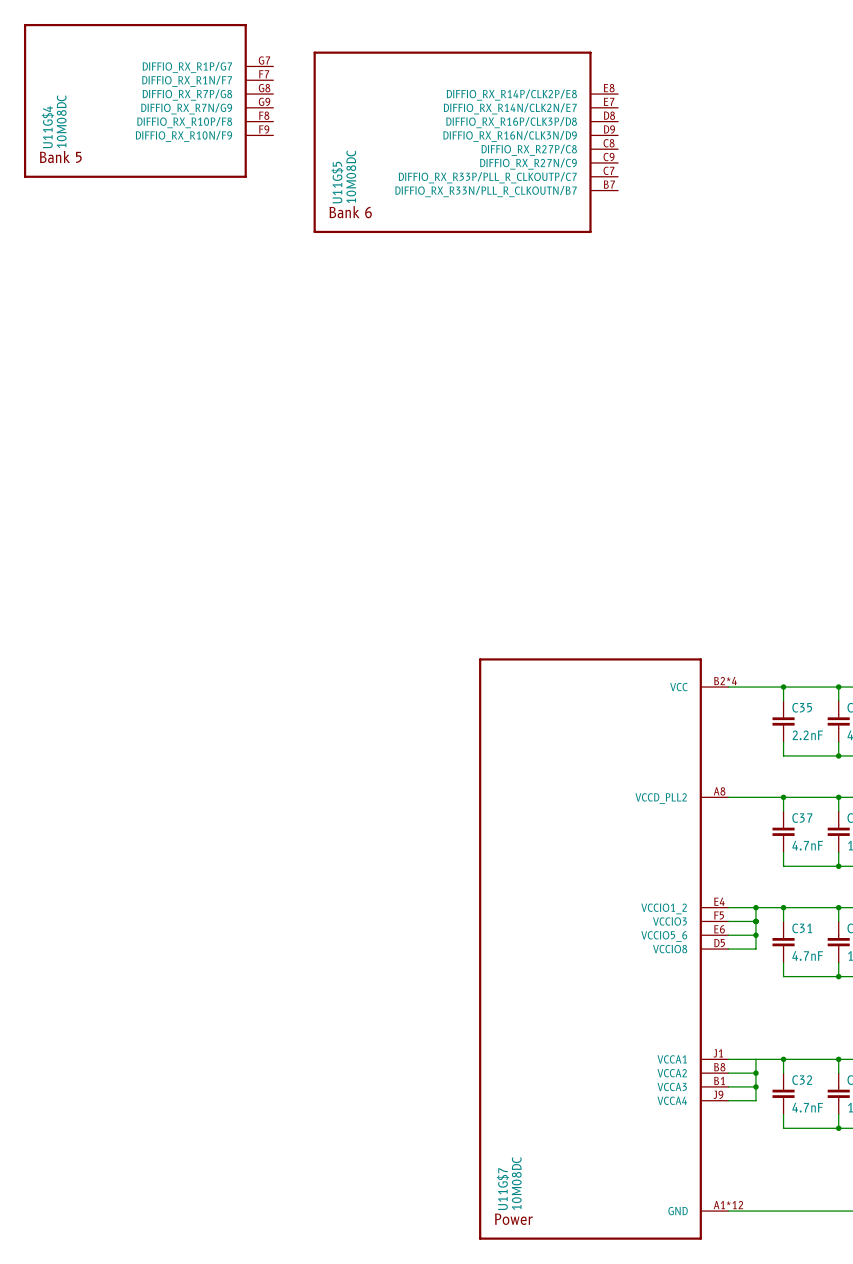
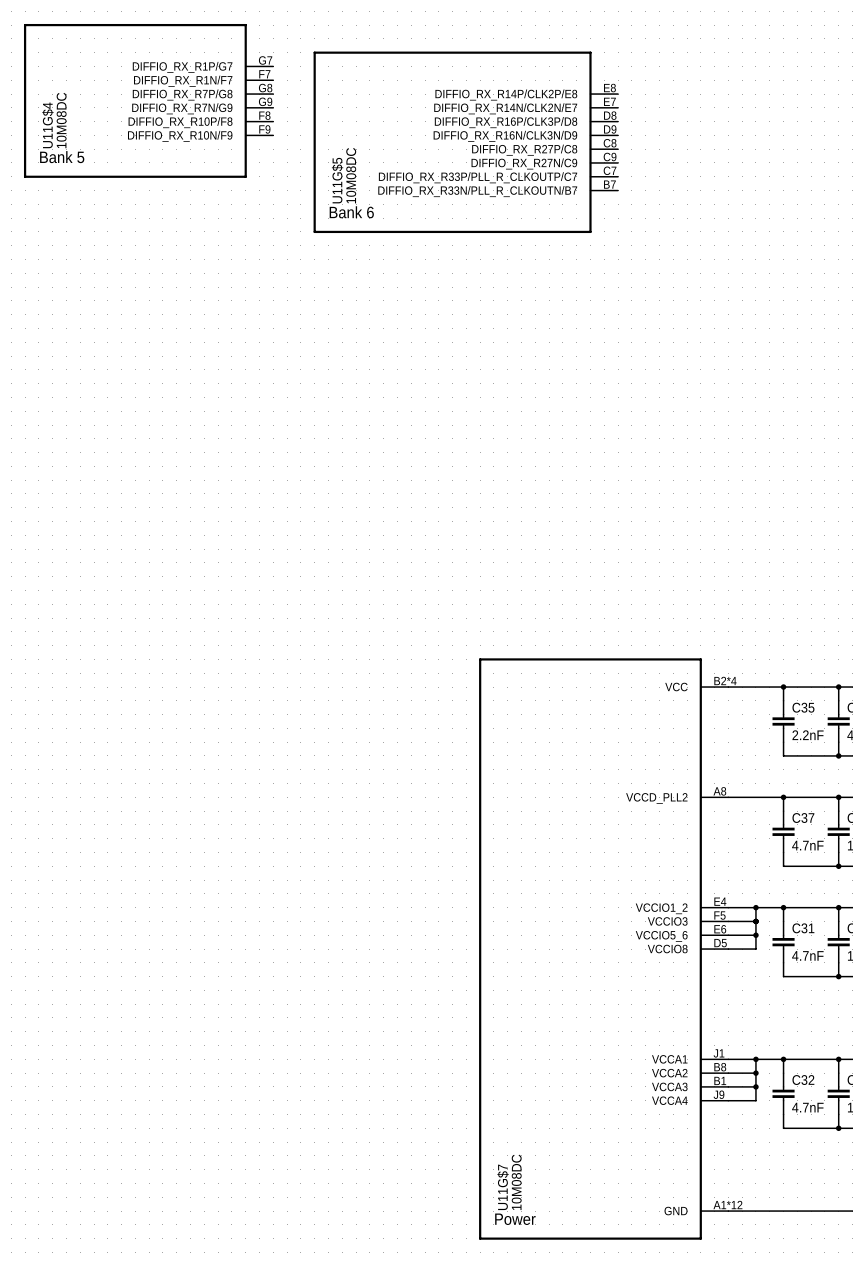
junction: none -> (755, 1059)

